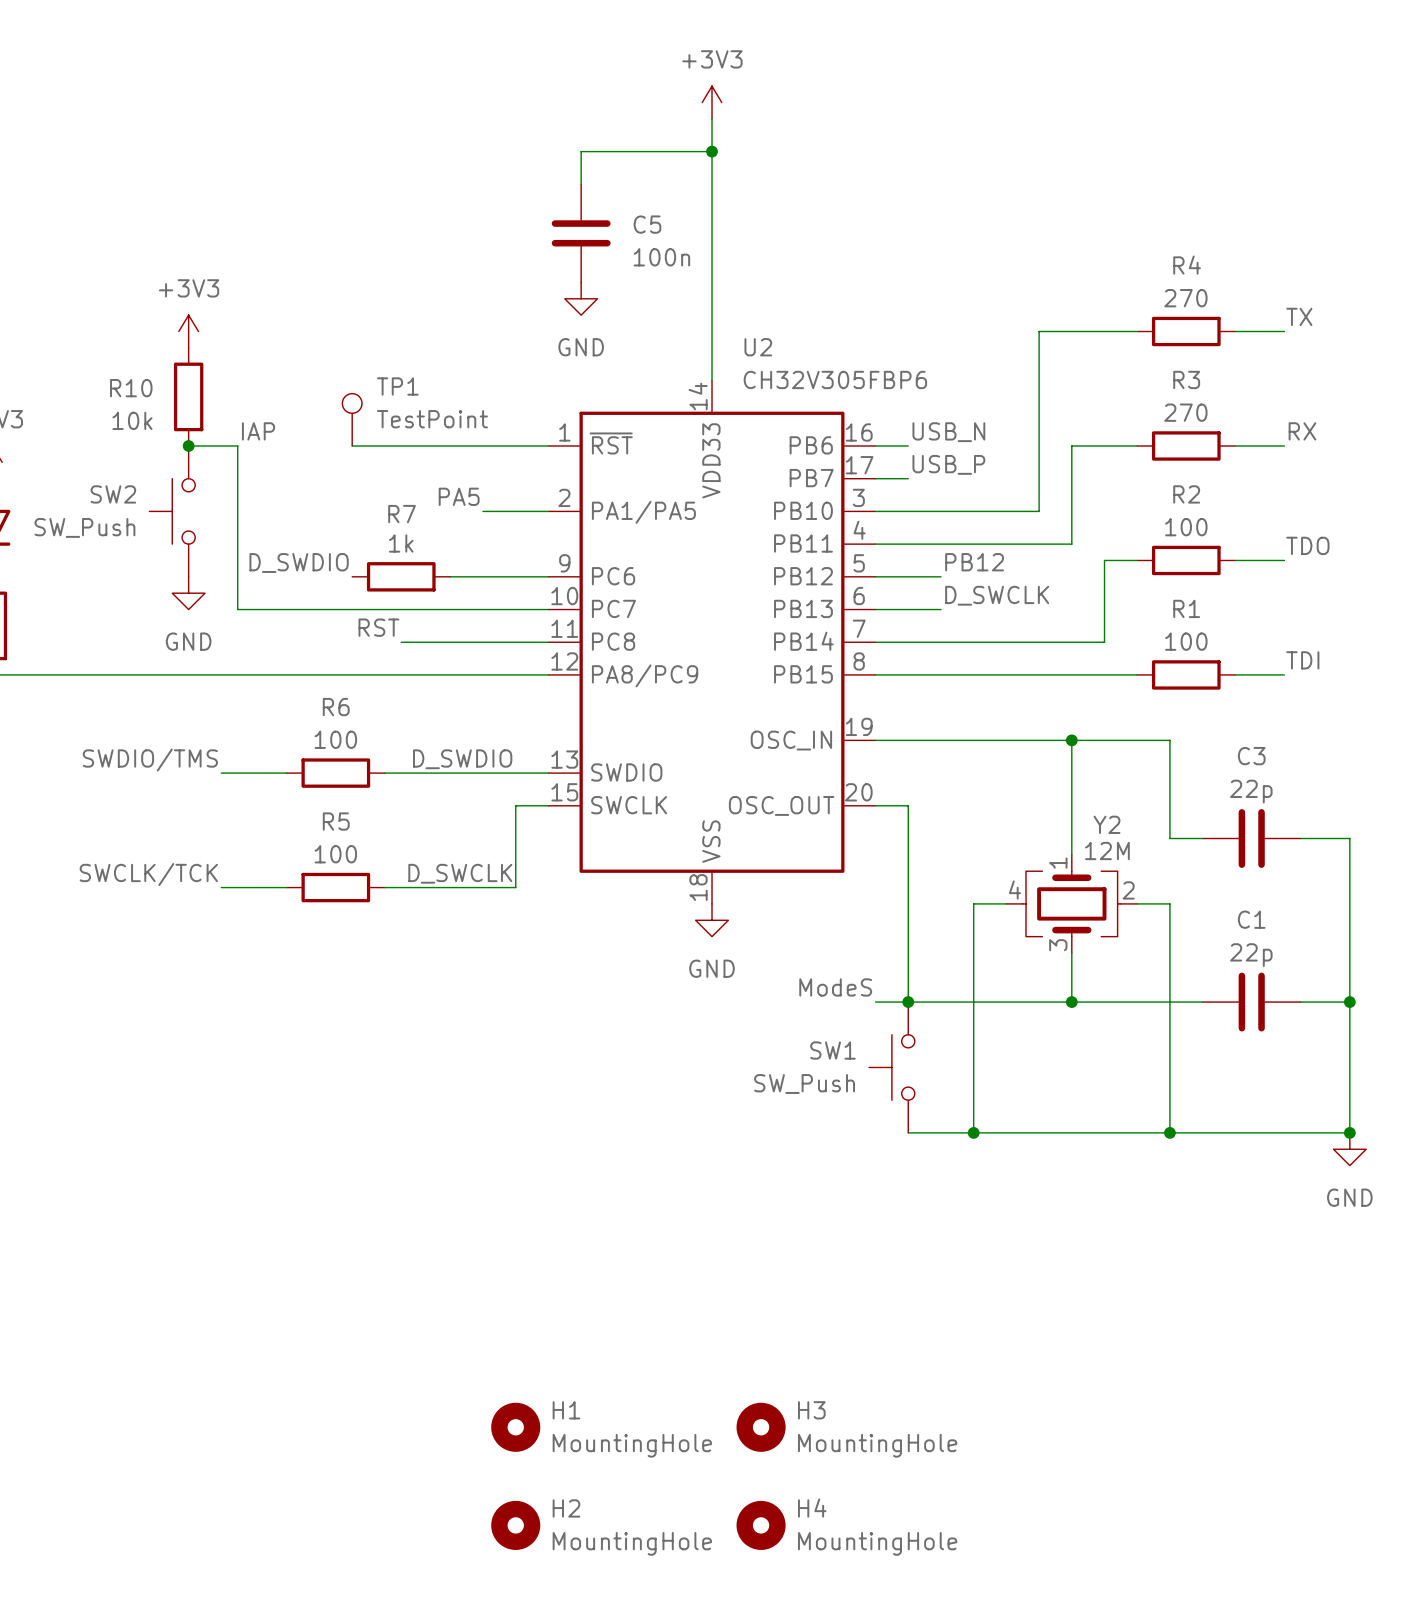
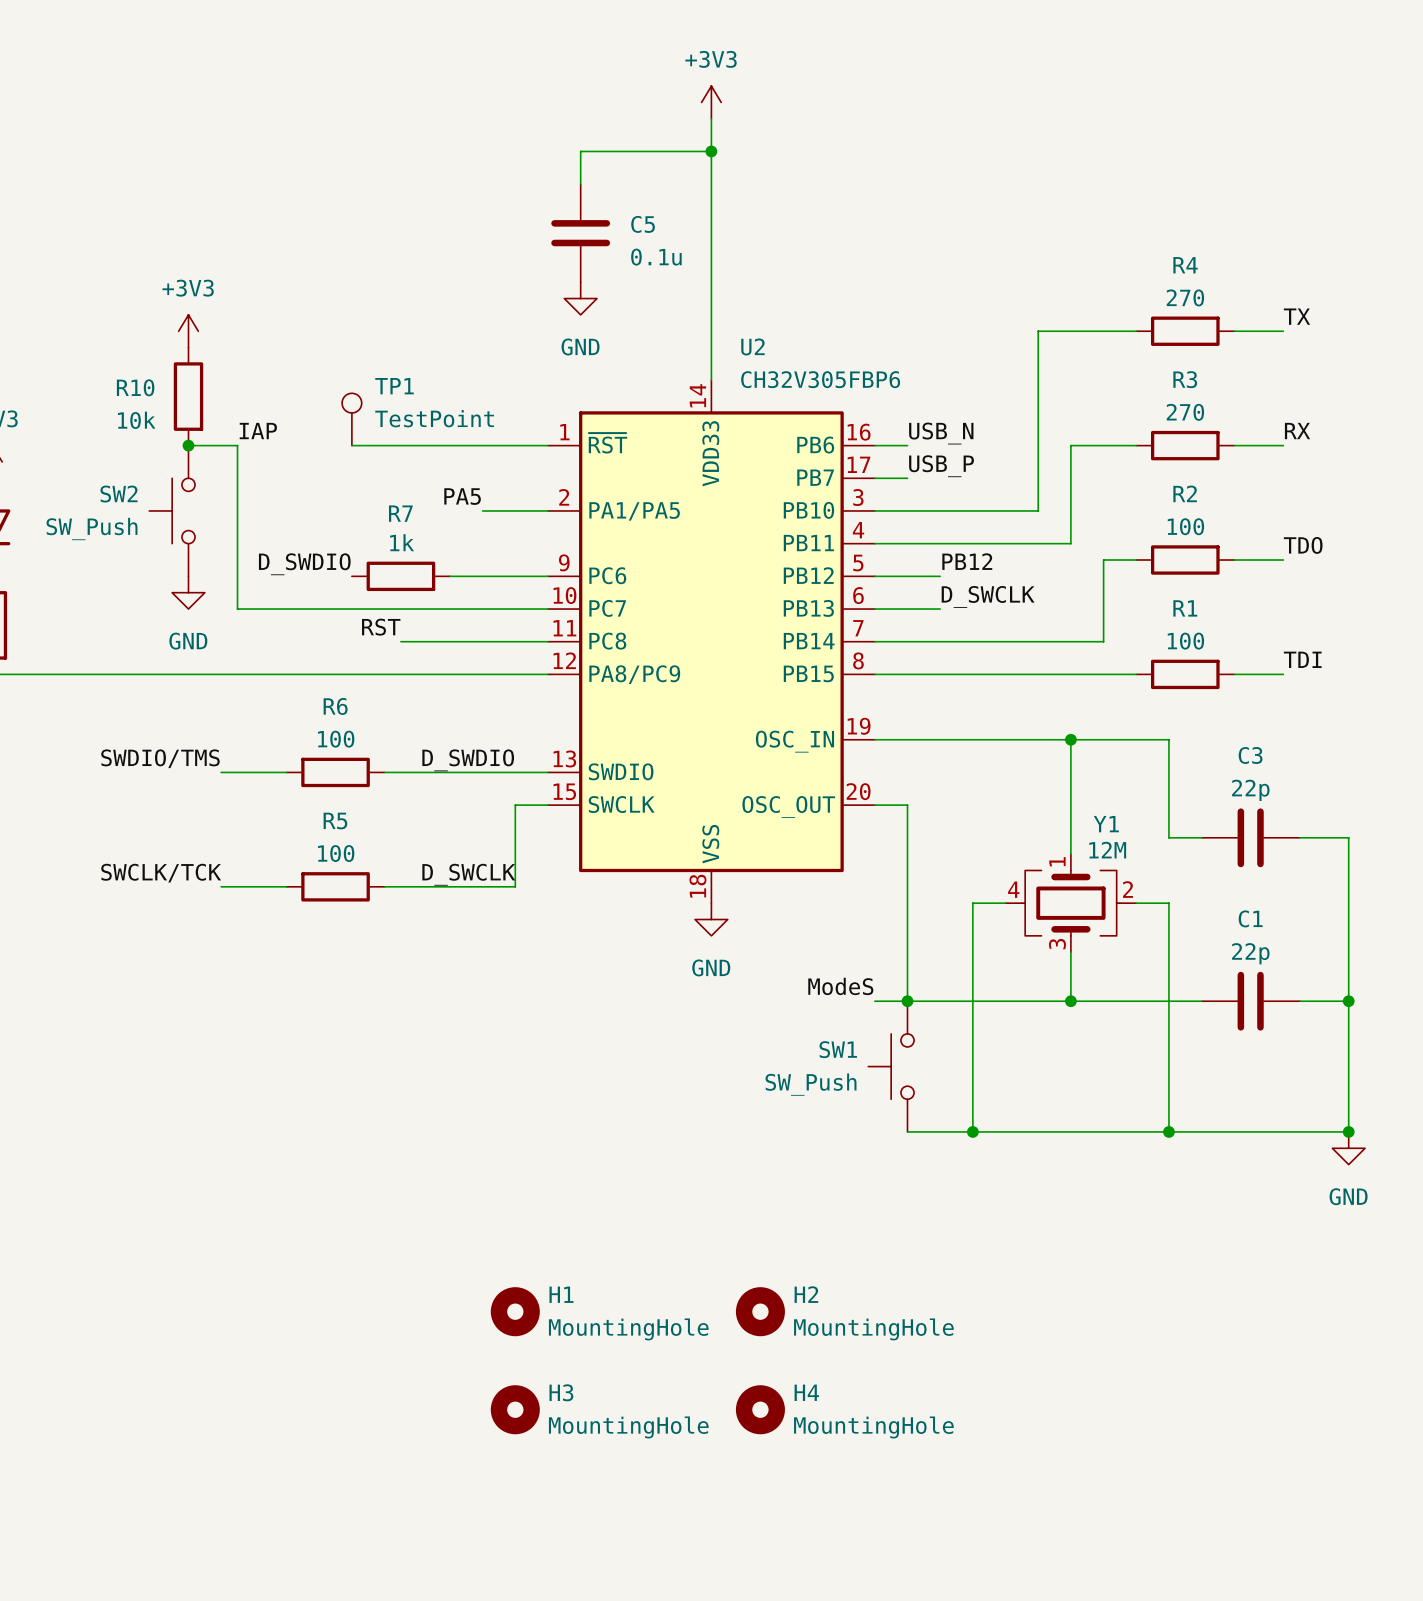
C5 value: 100n (661, 257) -> 0.1u (656, 257)
Y2 name: Y2 (1107, 824) -> Y1 (1106, 824)
H1 position: (515, 1427) -> (515, 1311)
H3 position: (761, 1427) -> (515, 1409)
H2 position: (515, 1525) -> (760, 1311)
H4 position: (761, 1525) -> (760, 1409)

